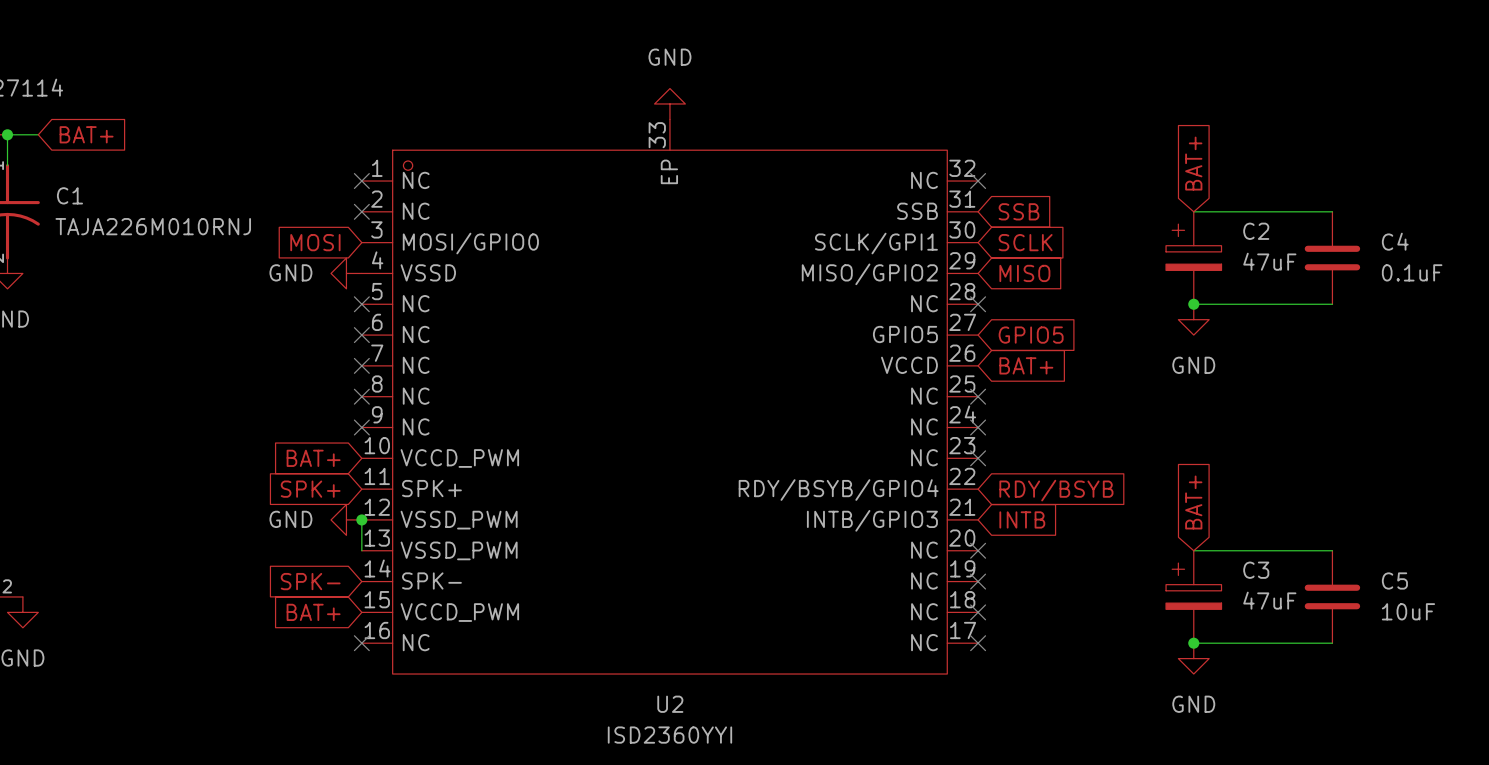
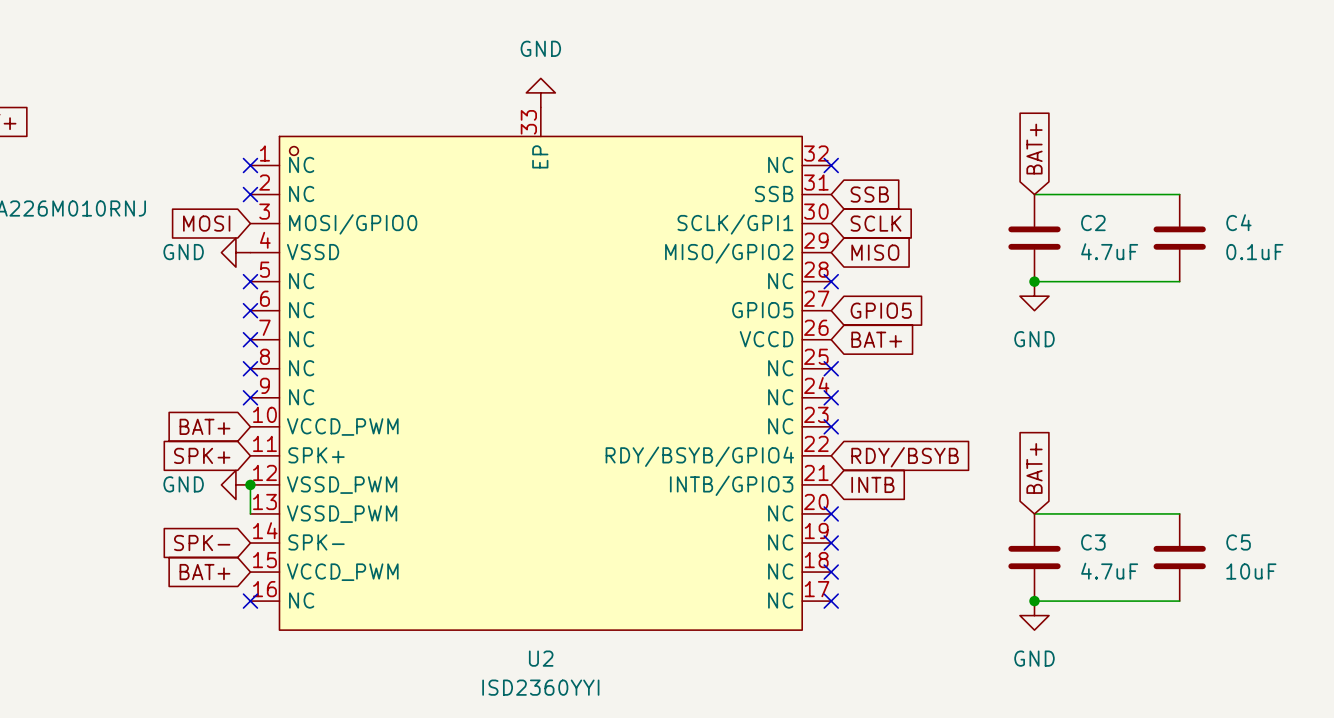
C2 symbol: [1166, 211, 1222, 305] -> [1008, 194, 1061, 282]
wire: none -> (1165, 194) (1179, 194)
C4 position: (1332, 258) -> (1179, 238)
C2 value: 47uF (1269, 261) -> 4.7uF (1109, 251)
wire: none -> (1165, 281) (1179, 281)
C3 symbol: [1166, 550, 1222, 644] -> [1008, 513, 1061, 602]
wire: none -> (1165, 513) (1179, 513)
C5 position: (1332, 596) -> (1179, 557)
C3 value: 47uF (1269, 600) -> 4.7uF (1109, 571)
wire: none -> (1165, 601) (1179, 601)

